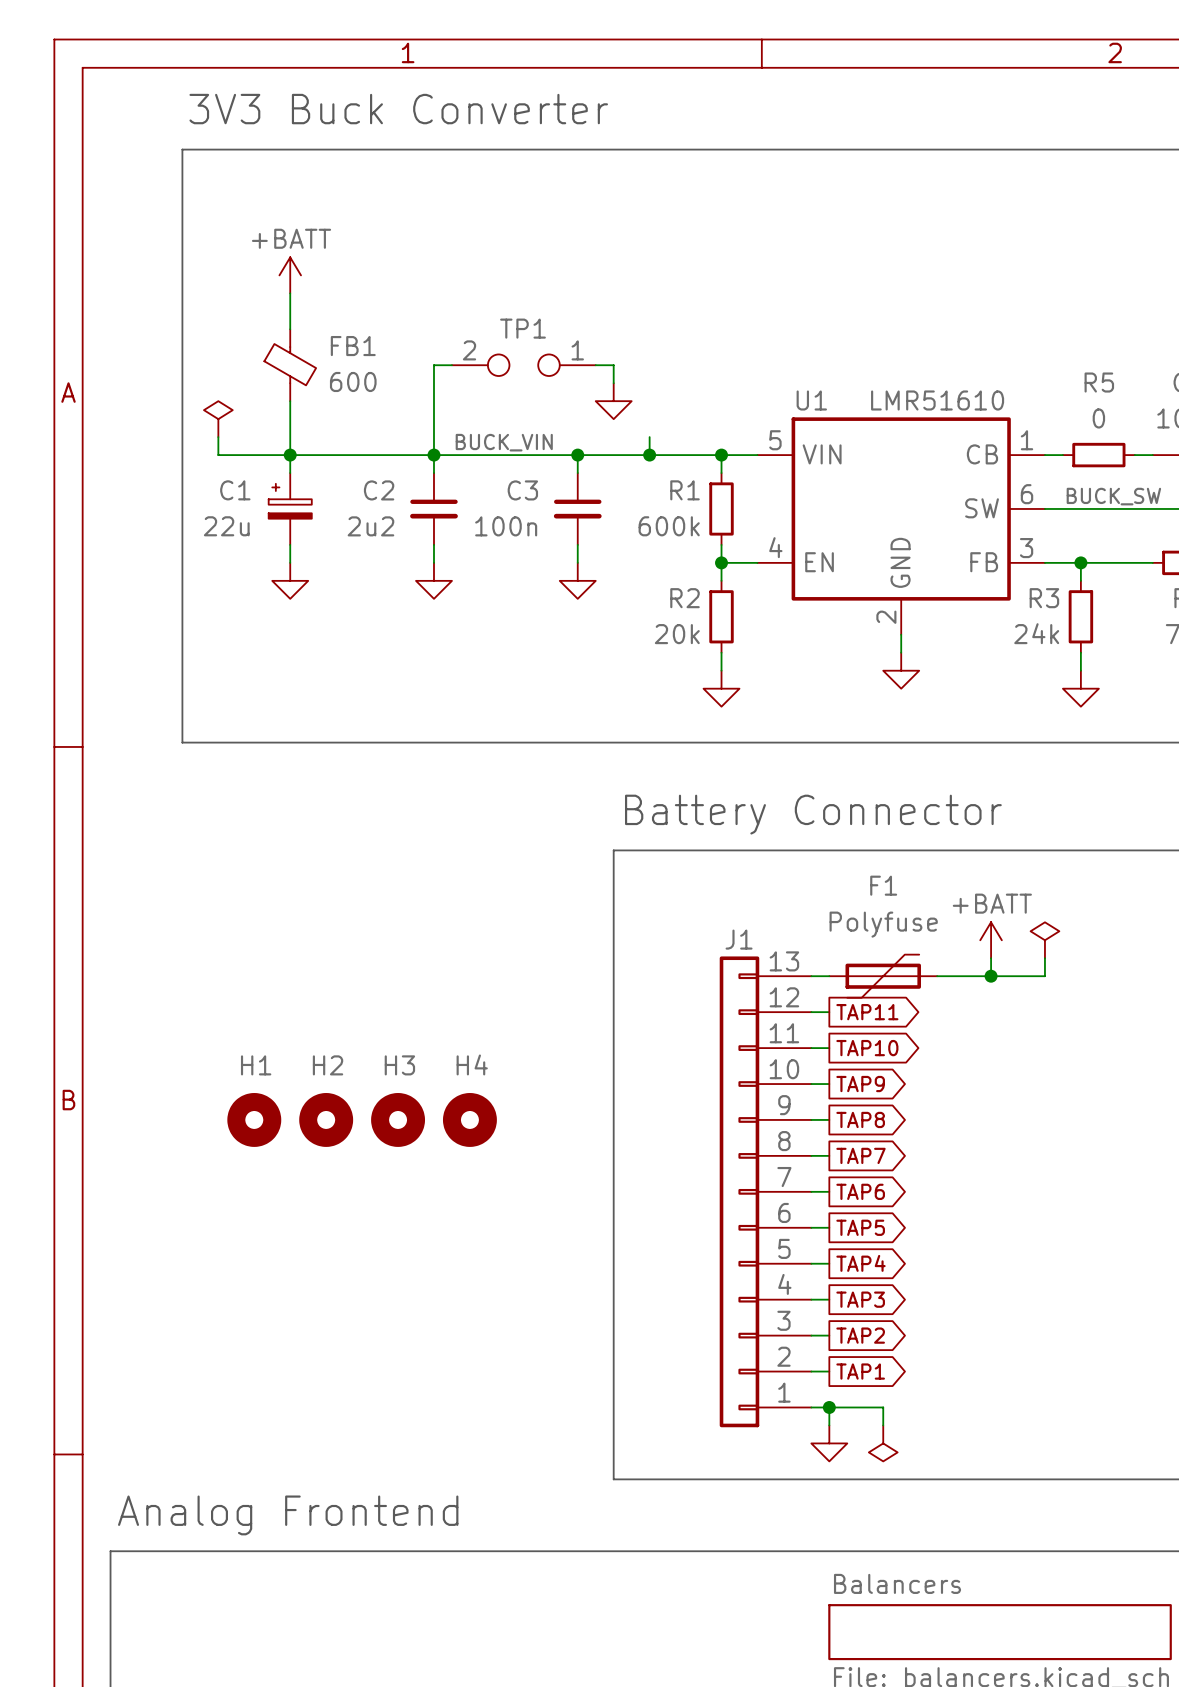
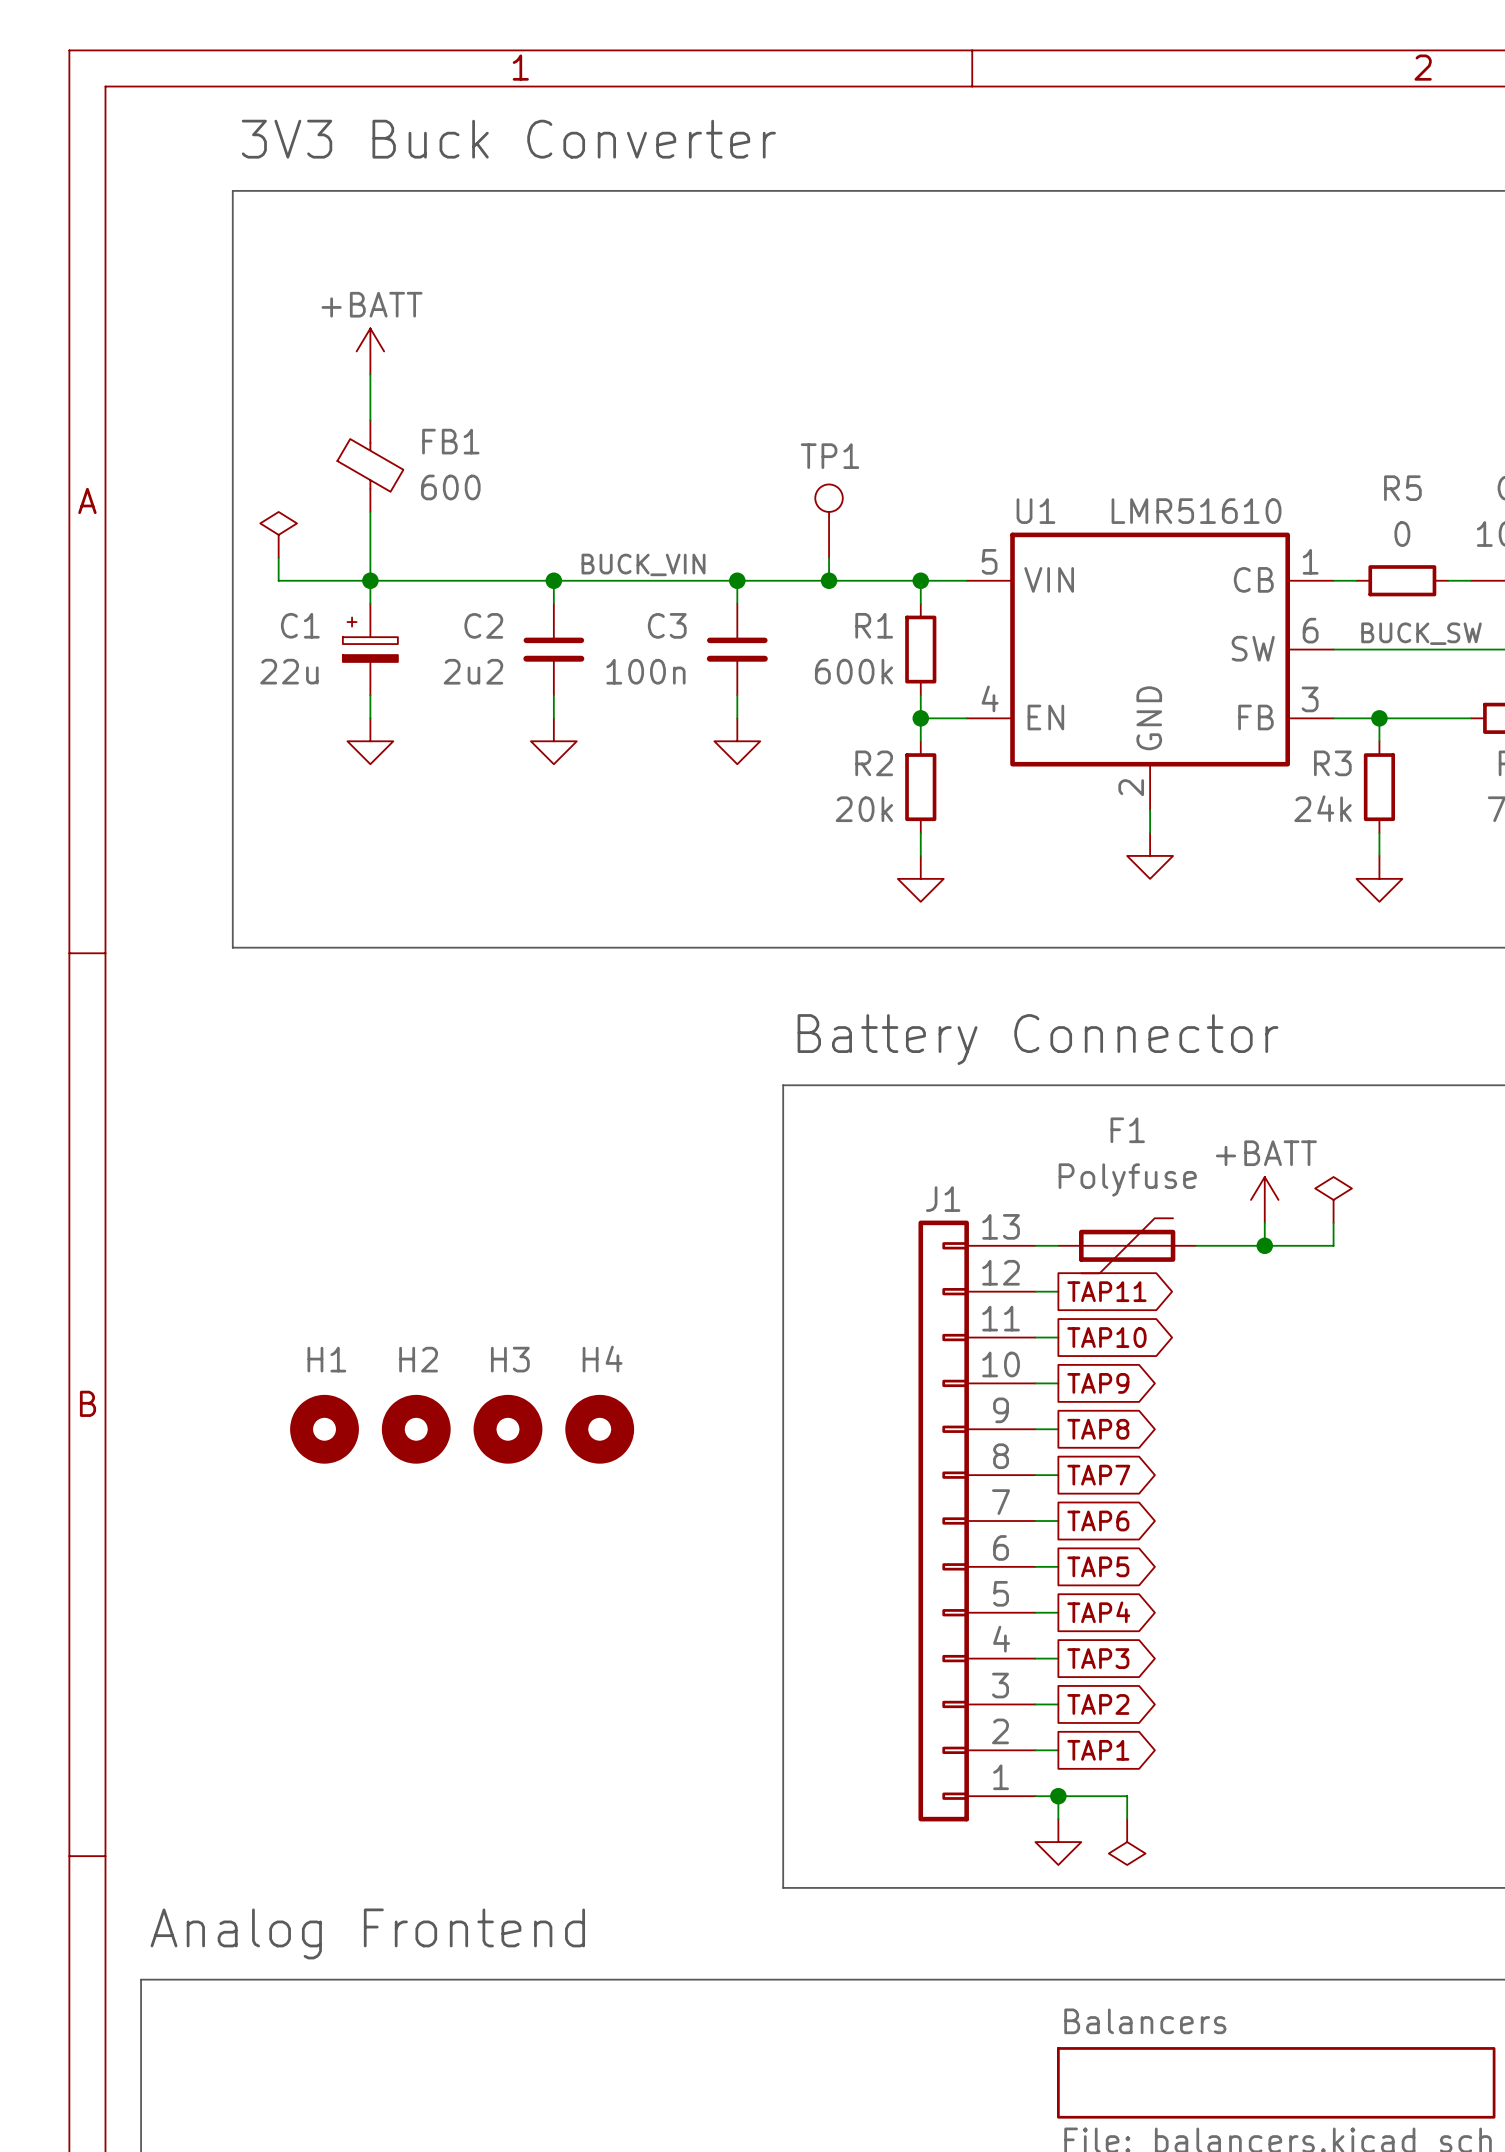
TP1 symbol: [451, 354, 596, 377] -> [815, 484, 843, 558]
wire: (451, 365) (433, 365) (433, 455) -> none
wire: (595, 365) (613, 365) (613, 383) -> none
power symbol: (613, 401) -> none

